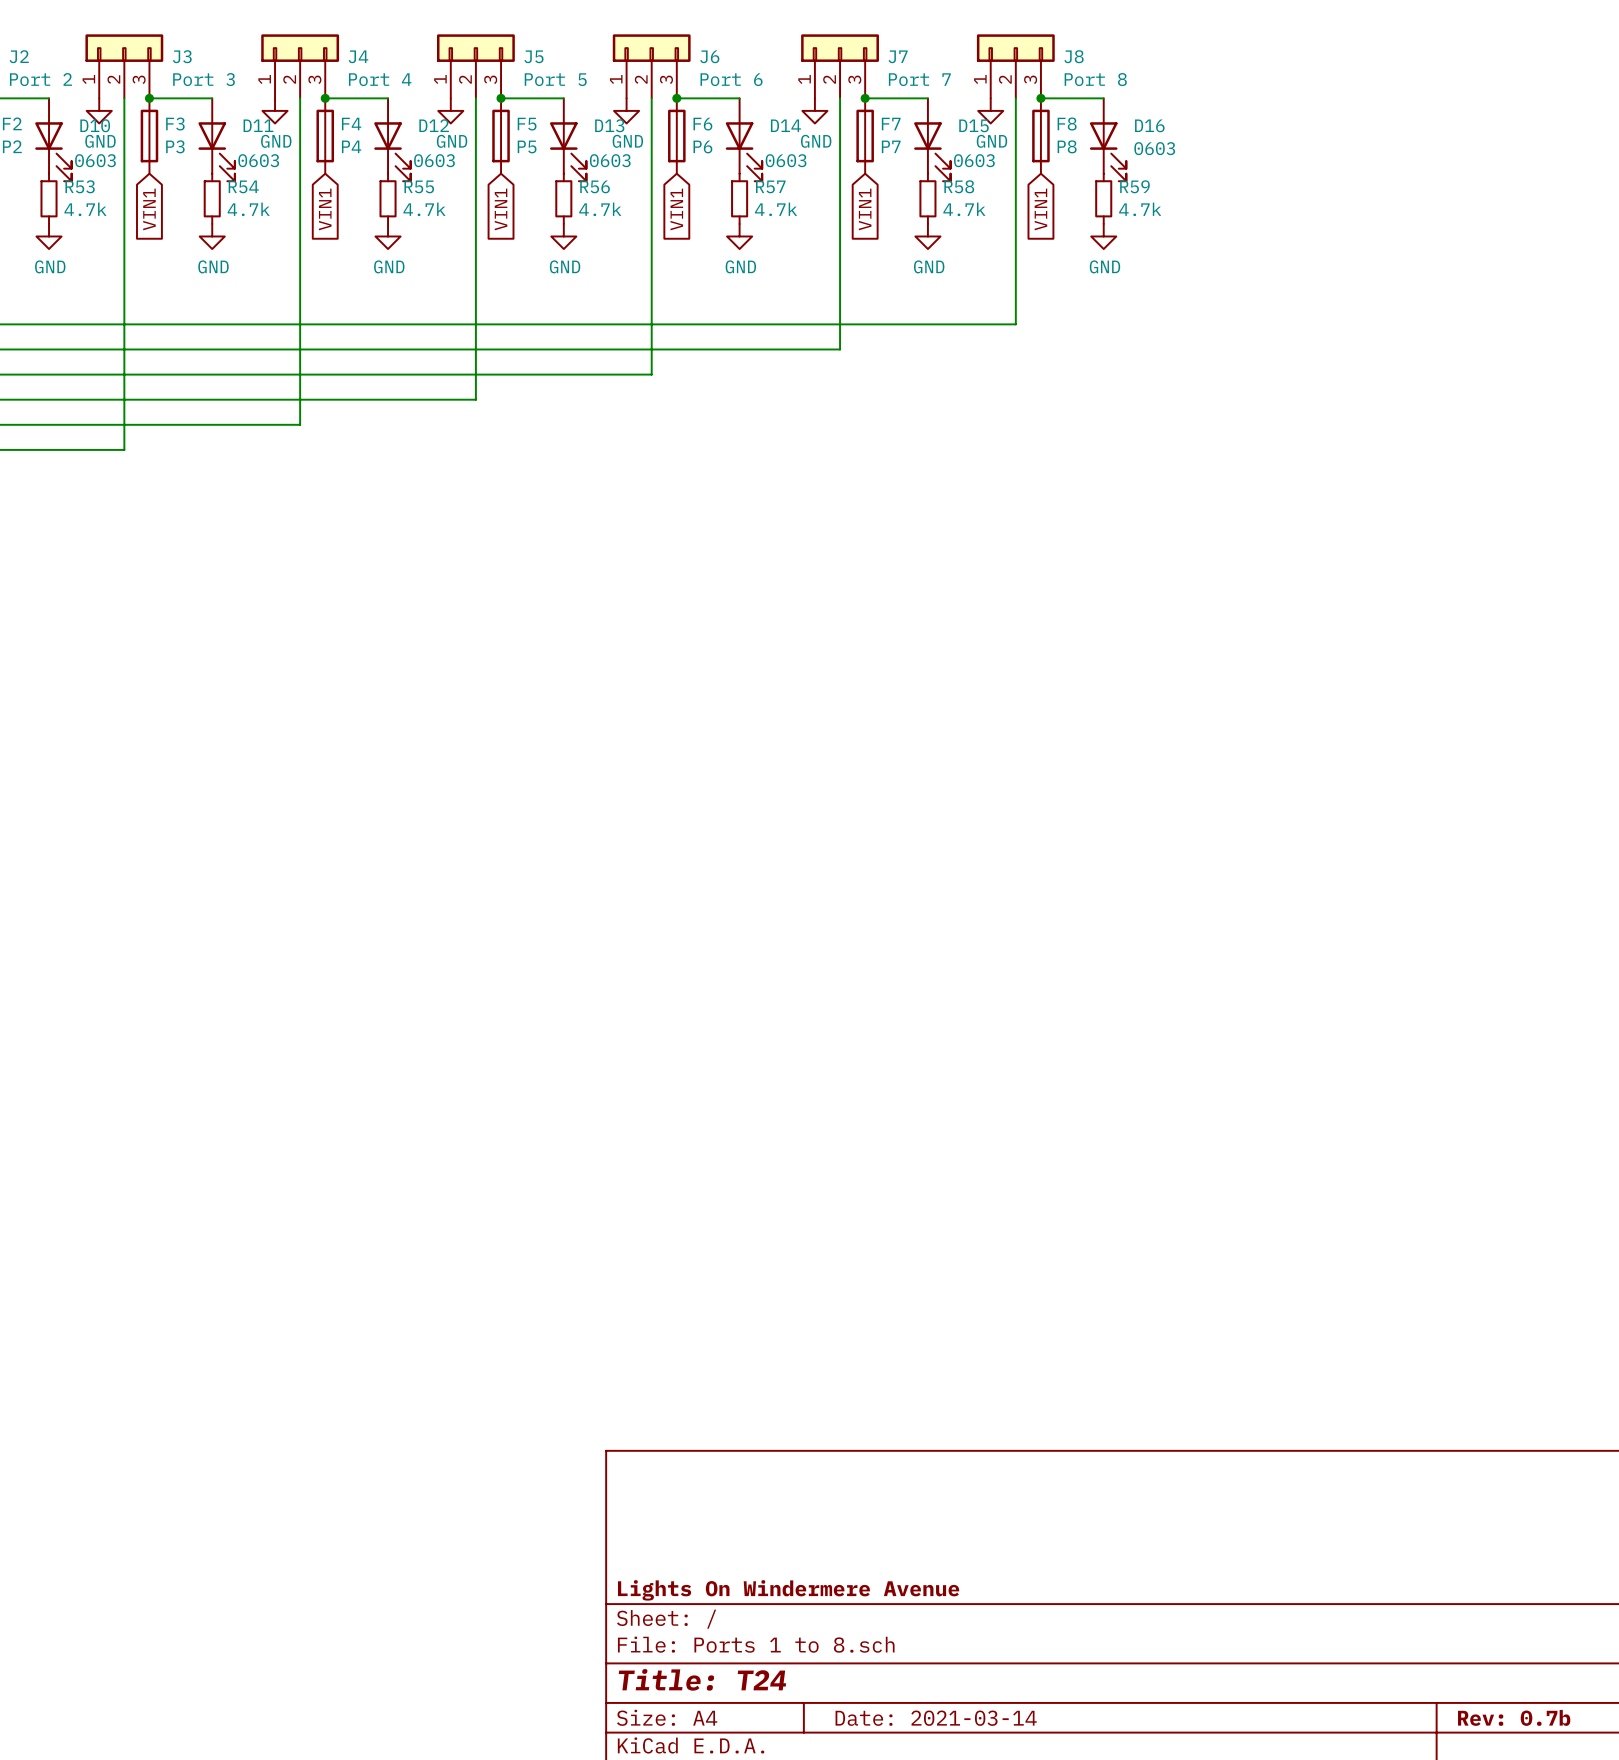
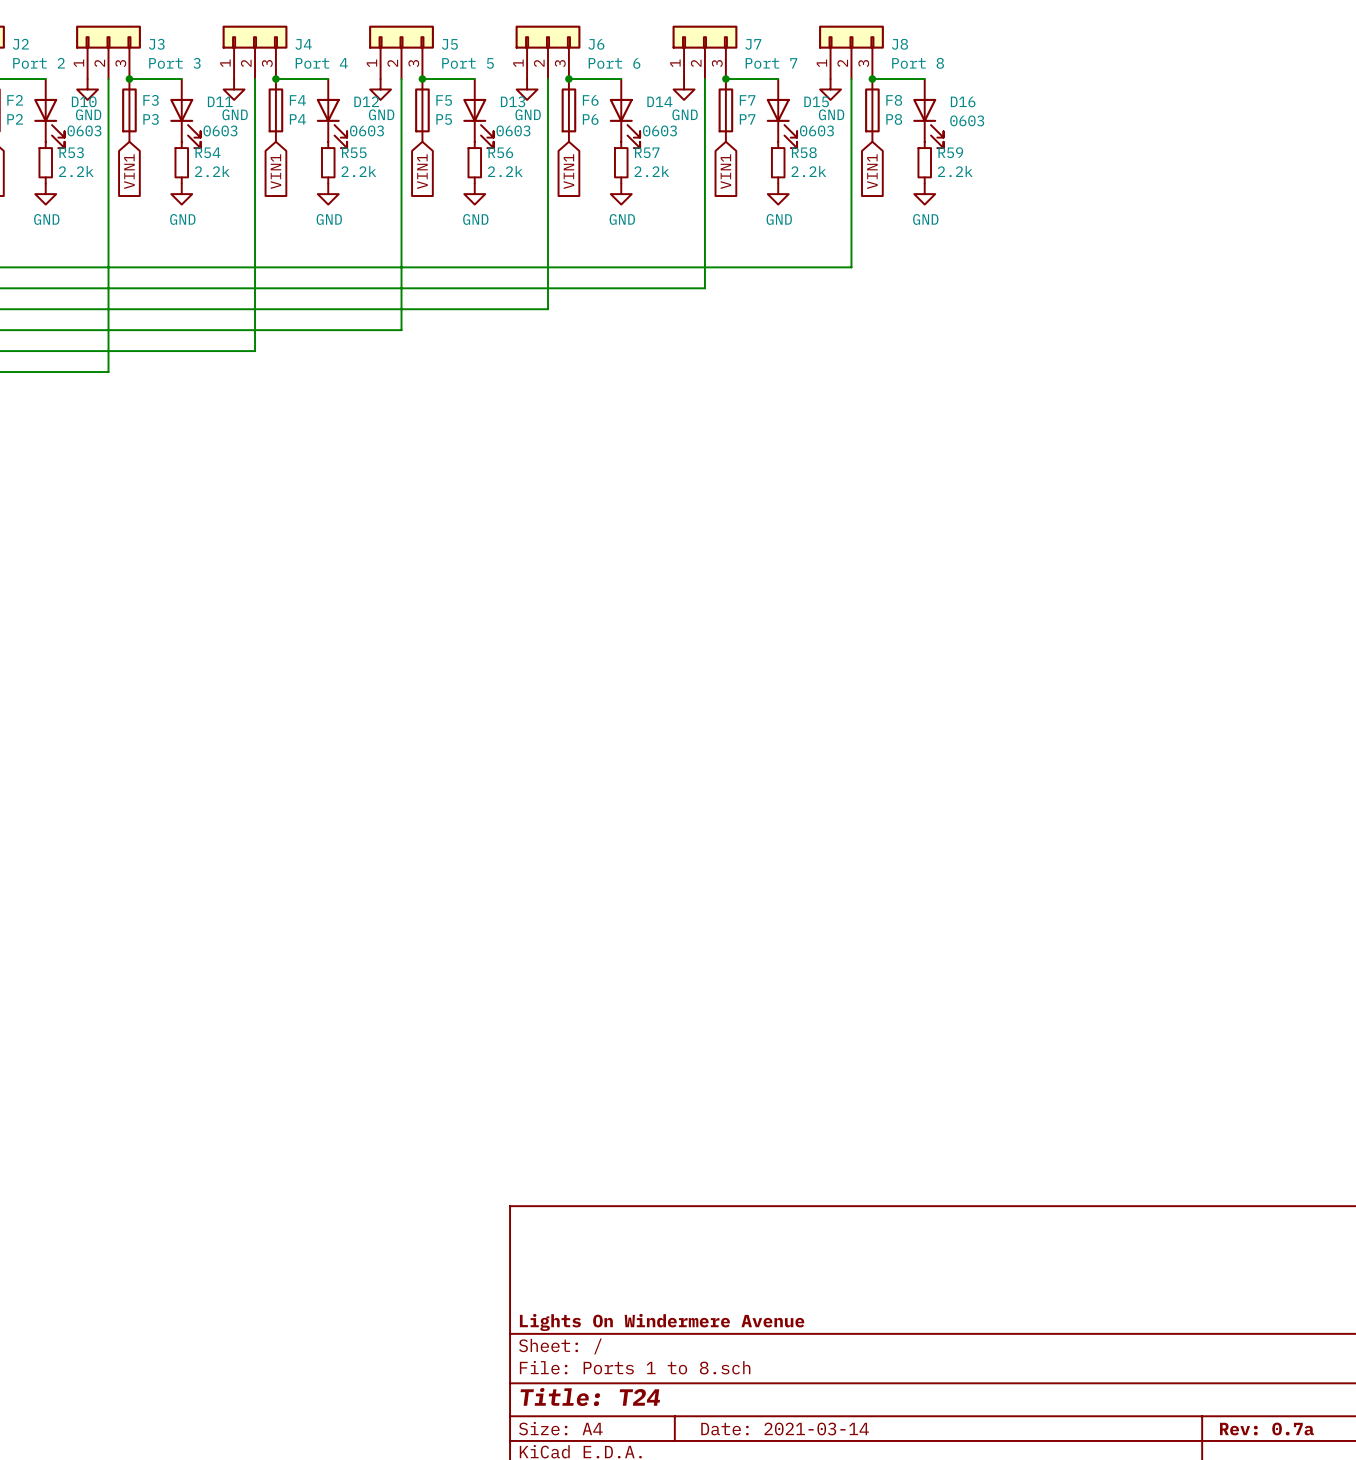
R53 value: 4.7k (85, 209) -> 2.2k (76, 171)
R54 value: 4.7k (248, 209) -> 2.2k (212, 171)
R55 value: 4.7k (424, 209) -> 2.2k (358, 171)
R56 value: 4.7k (600, 209) -> 2.2k (505, 171)
R57 value: 4.7k (776, 209) -> 2.2k (651, 171)
R58 value: 4.7k (964, 209) -> 2.2k (808, 171)
R59 value: 4.7k (1140, 209) -> 2.2k (955, 171)
title block: Rev: 0.7b (1514, 1717) -> Rev: 0.7a (1266, 1428)

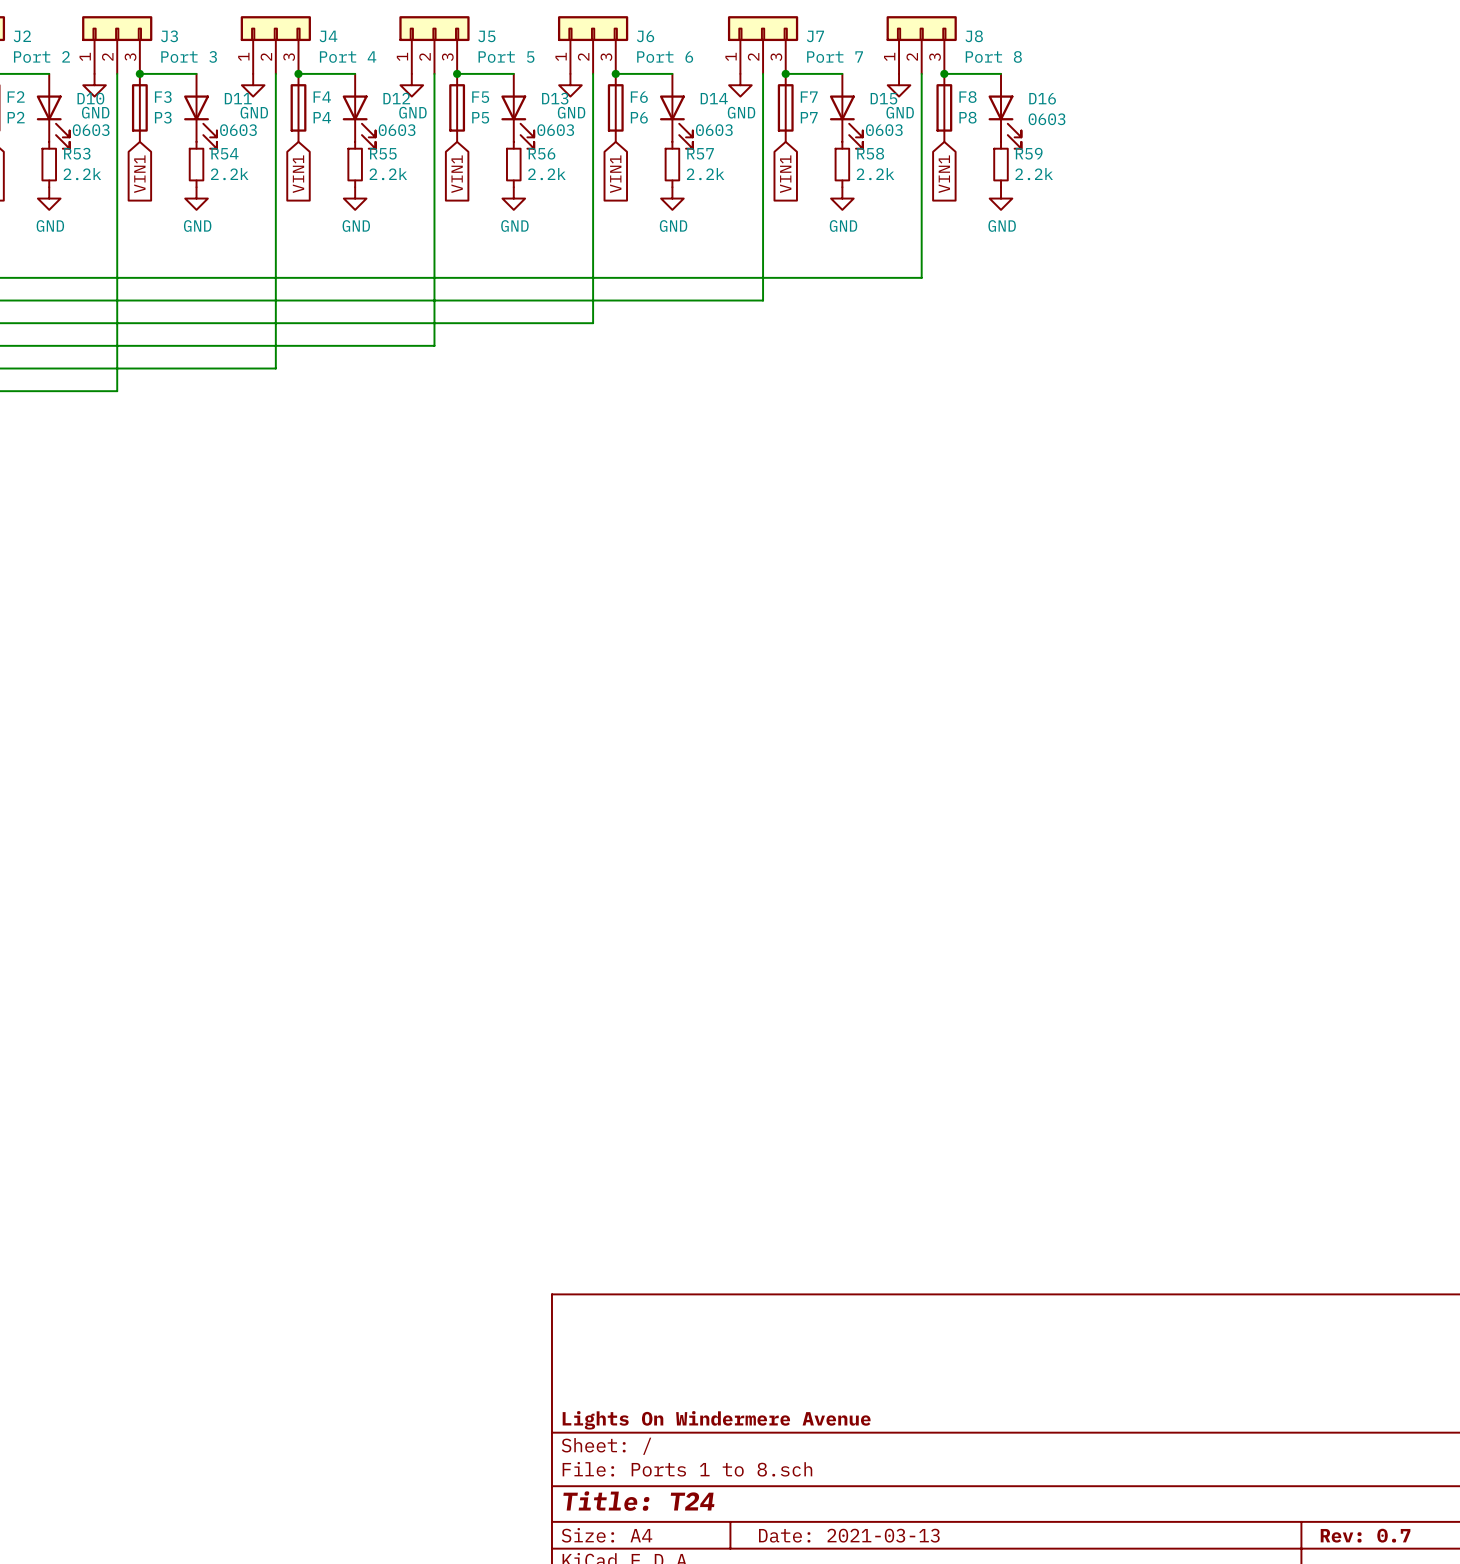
title block: Date: 2021-03-14 (785, 1428) -> Date: 2021-03-13 (849, 1535)
title block: Rev: 0.7a (1266, 1428) -> Rev: 0.7 (1365, 1535)

